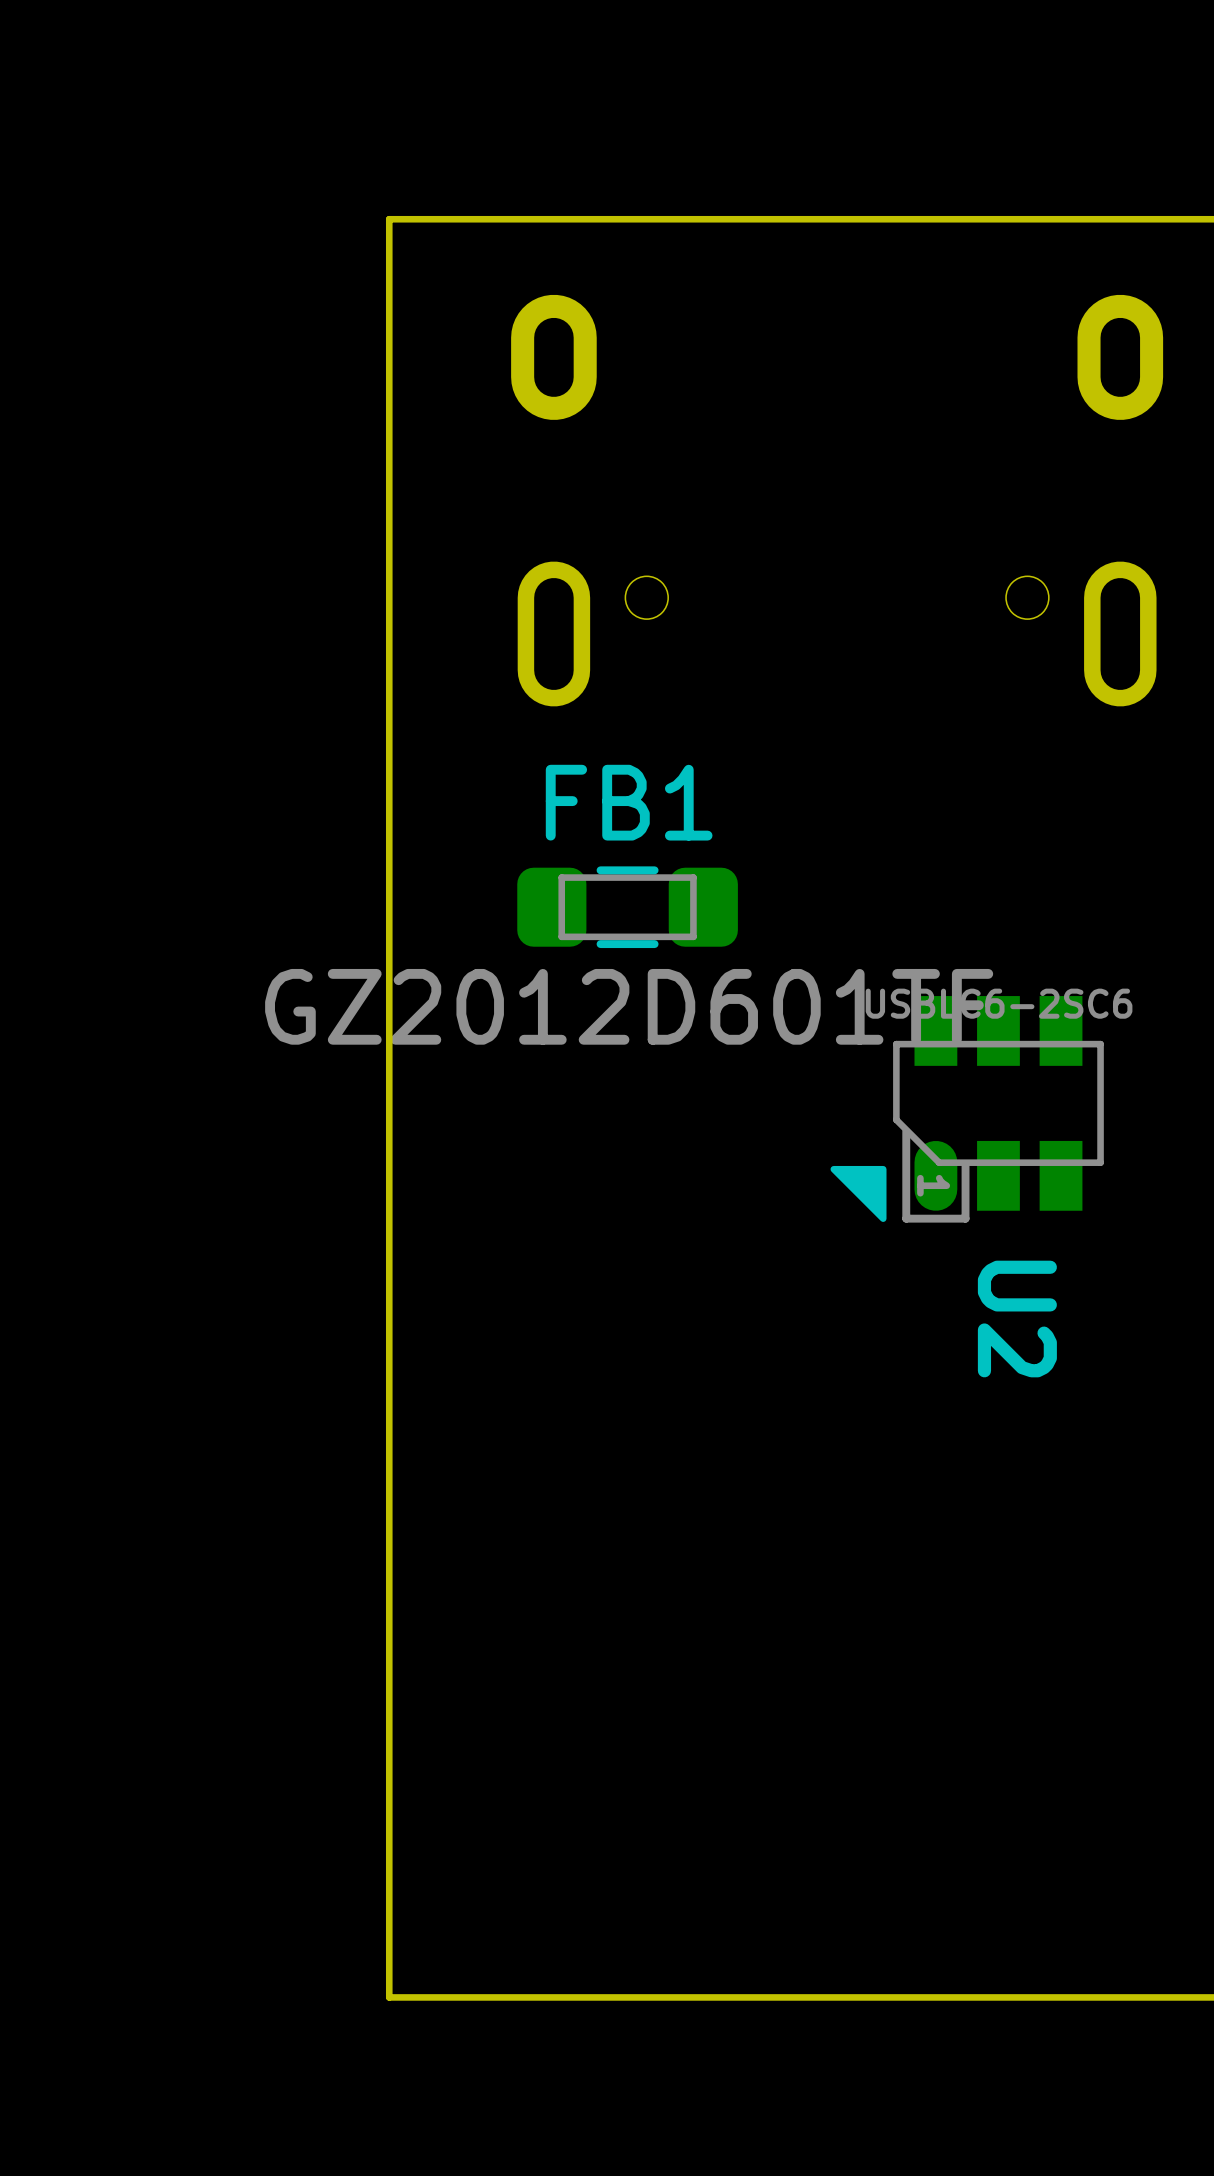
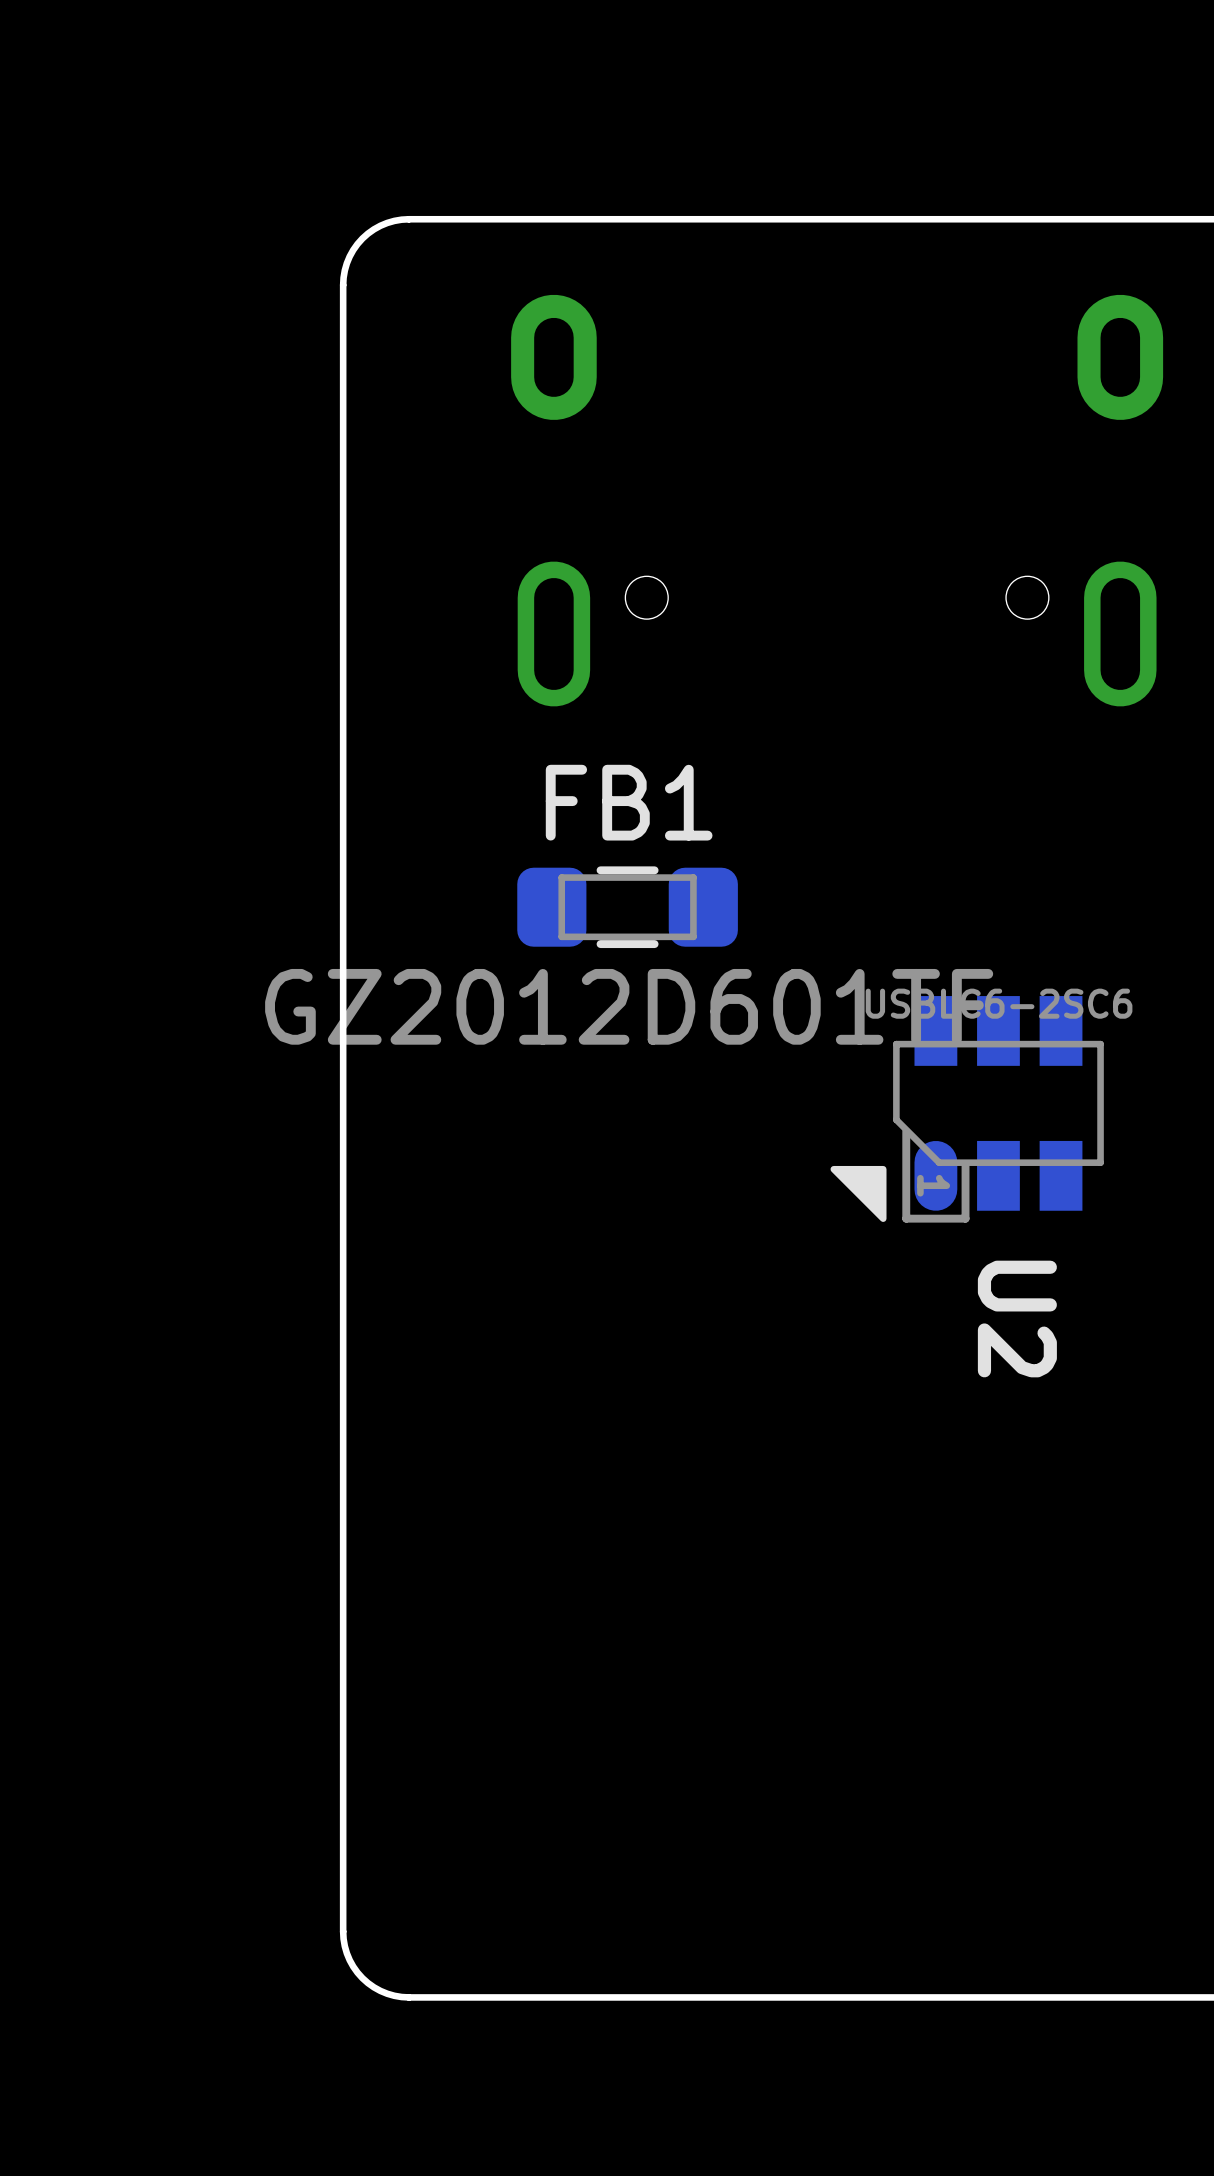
board edge: (409, 219) (389, 219) (389, 1997) (409, 1997) -> (409, 219) (394, 220) (380, 225) (362, 238) (353, 250) (346, 263) (343, 285) (343, 1931) (346, 1953) (353, 1966) (362, 1978) (380, 1990) (394, 1995) (409, 1997)

